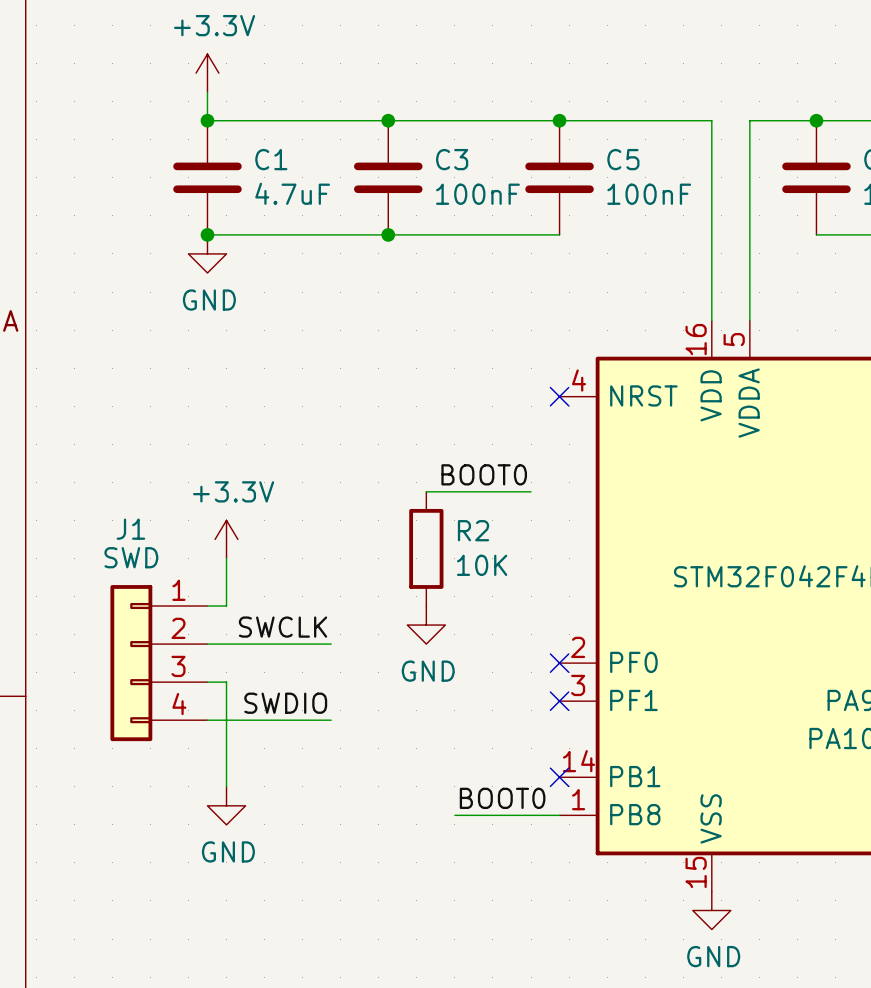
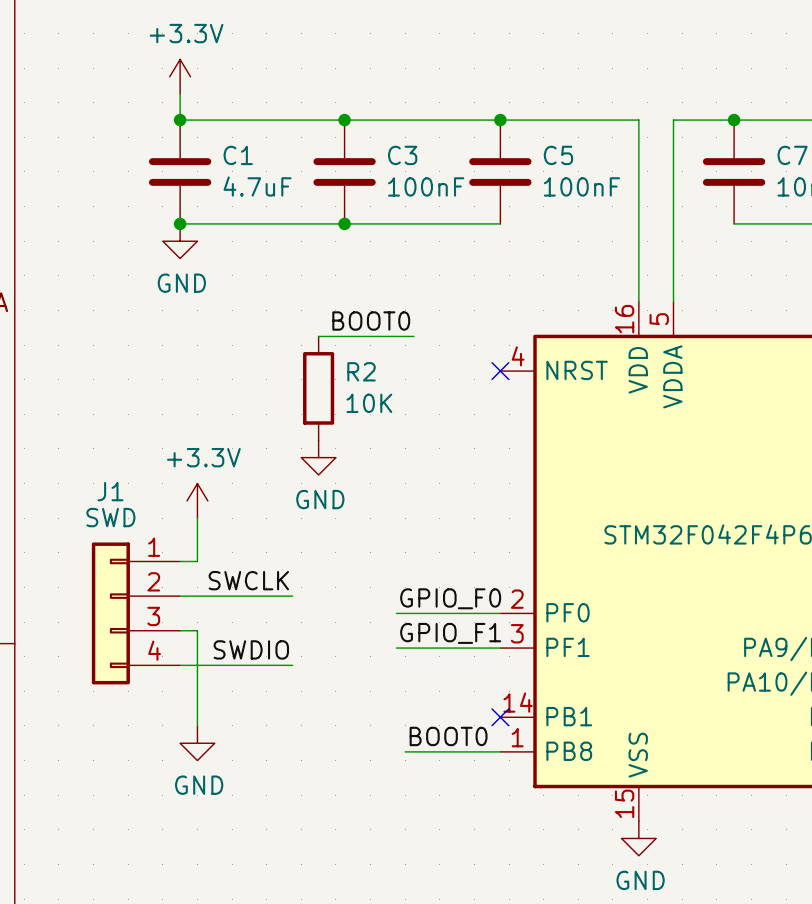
label position: BOOT0 (484, 474) -> BOOT0 (371, 321)
wire: (426, 491) (531, 491) -> (318, 336) (413, 336)
R2 position: (426, 548) -> (318, 388)
power symbol position: GND (426, 625) -> GND (318, 457)
label: none -> GPIO_F0 (450, 598)
wire: none -> (396, 613) (500, 613)
no-connect mark: (559, 663) -> none
label: none -> GPIO_F1 (450, 633)
wire: none -> (396, 648) (500, 648)
no-connect mark: (559, 701) -> none

